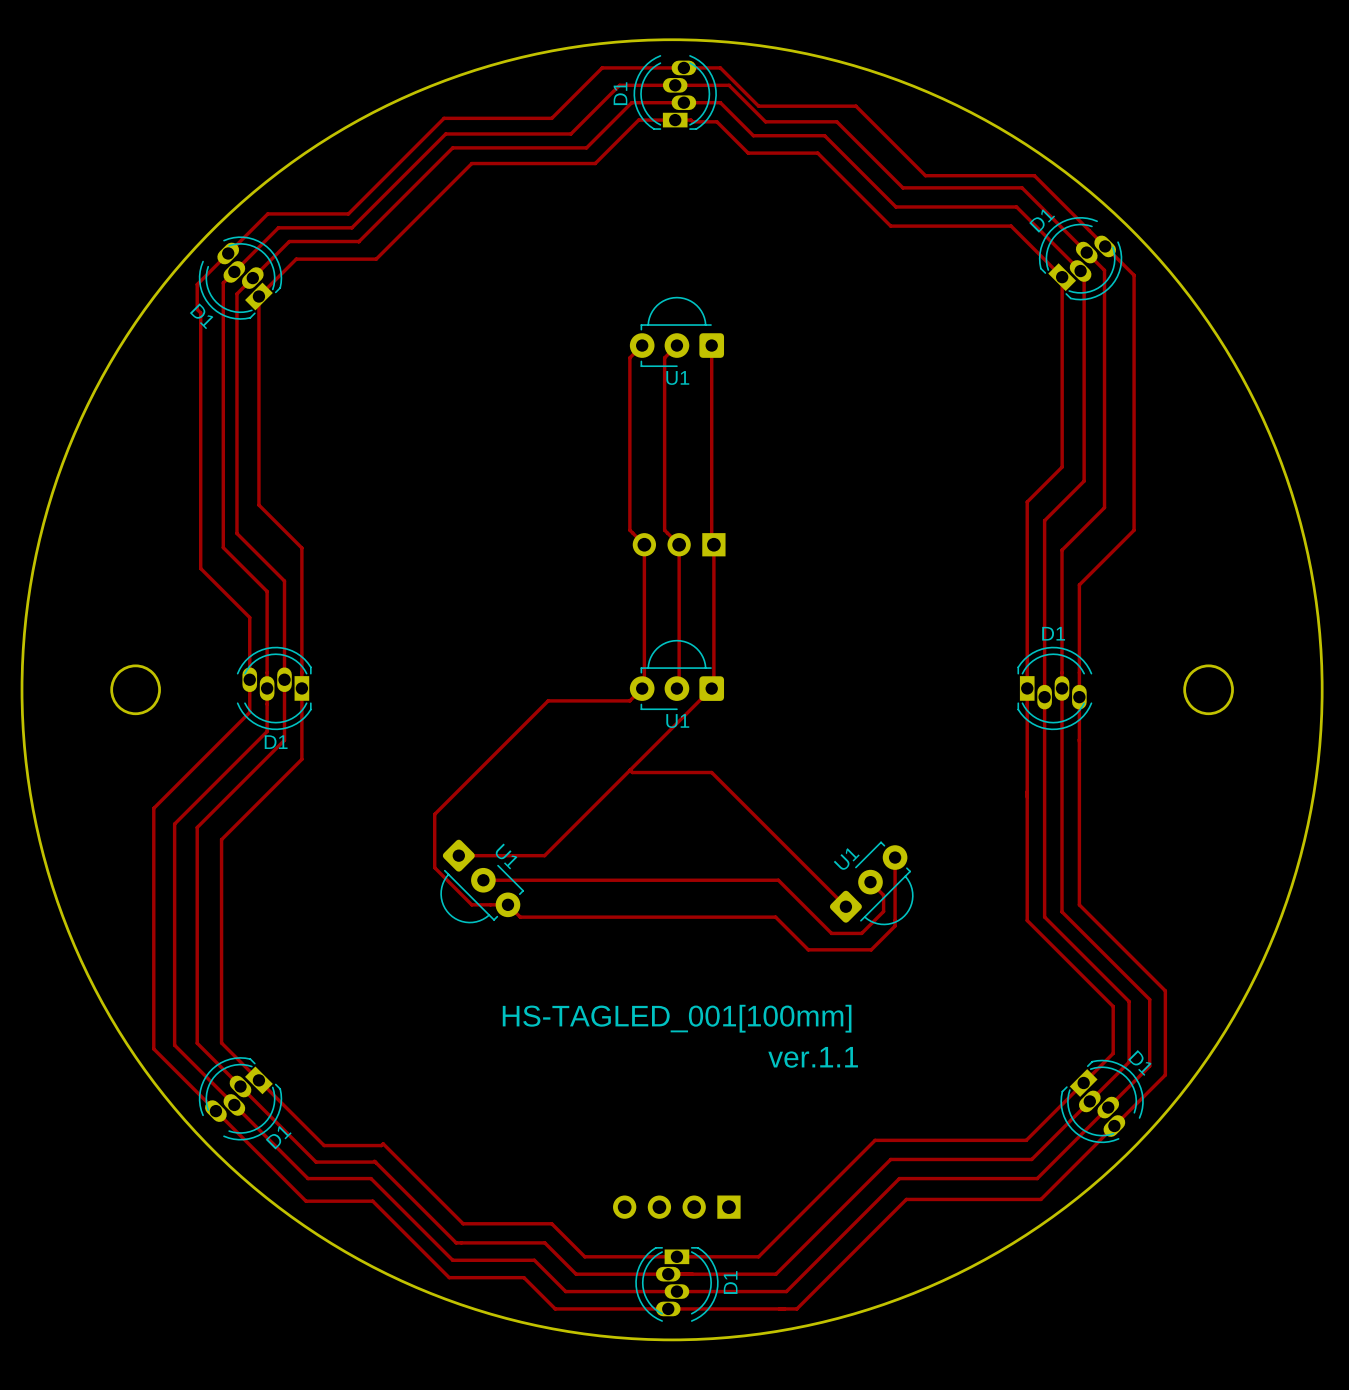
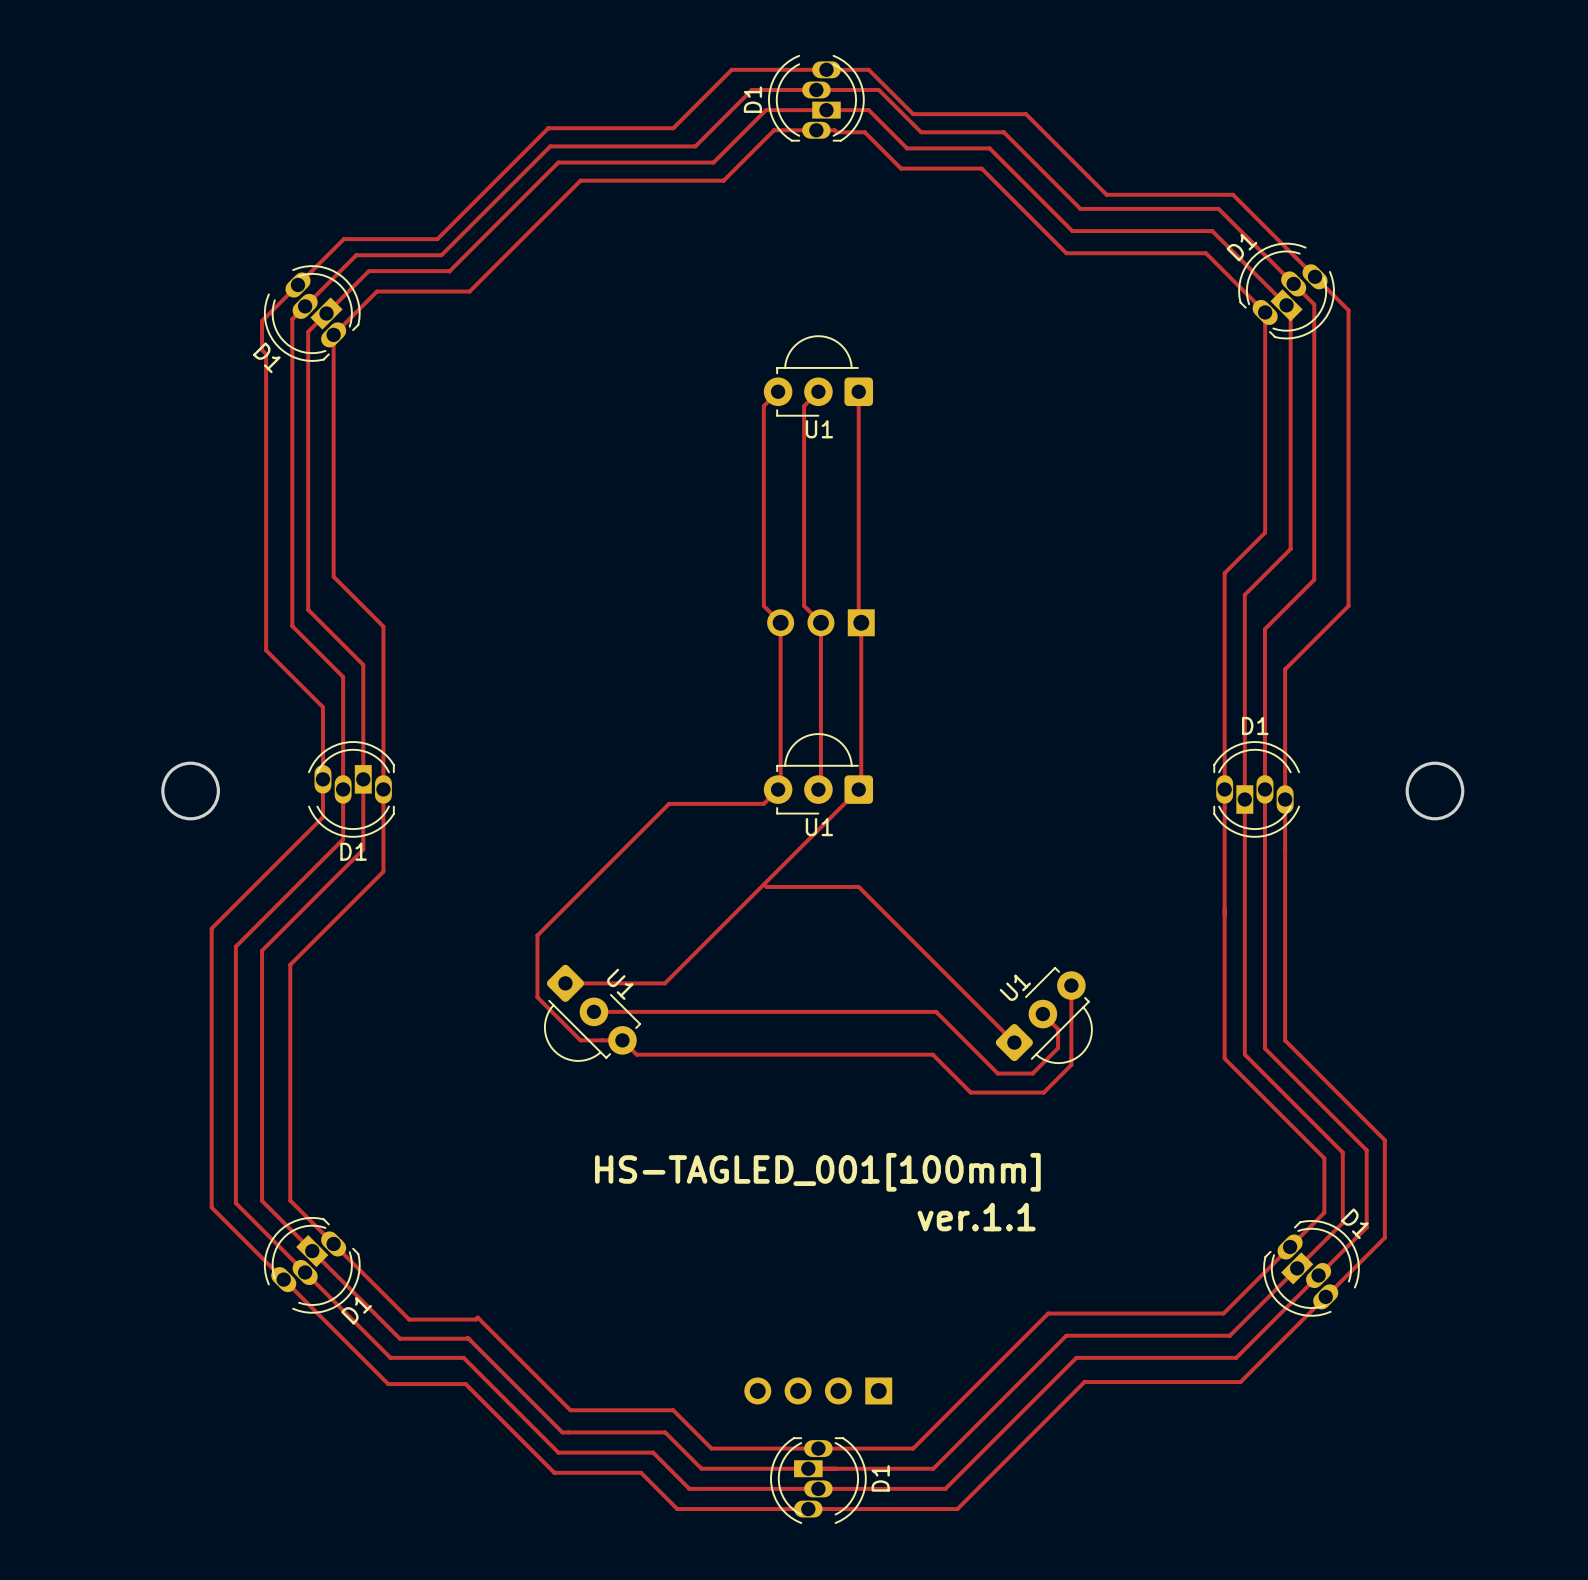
round board edge: [20, 38, 1324, 1342] -> none
D1 footprint: [633, 55, 717, 130] -> [768, 54, 865, 142]
D1 footprint: [1038, 217, 1123, 301] -> [1238, 242, 1335, 340]
D1 footprint: [198, 236, 283, 320] -> [263, 265, 361, 362]
D1 footprint: [236, 646, 312, 731] -> [308, 741, 395, 838]
D1 footprint: [1017, 646, 1093, 731] -> [1213, 741, 1301, 838]
D1 footprint: [198, 1057, 283, 1141] -> [263, 1216, 361, 1314]
D1 footprint: [1060, 1059, 1144, 1144] -> [1263, 1219, 1360, 1317]
D1 footprint: [635, 1247, 719, 1322] -> [770, 1437, 867, 1525]

